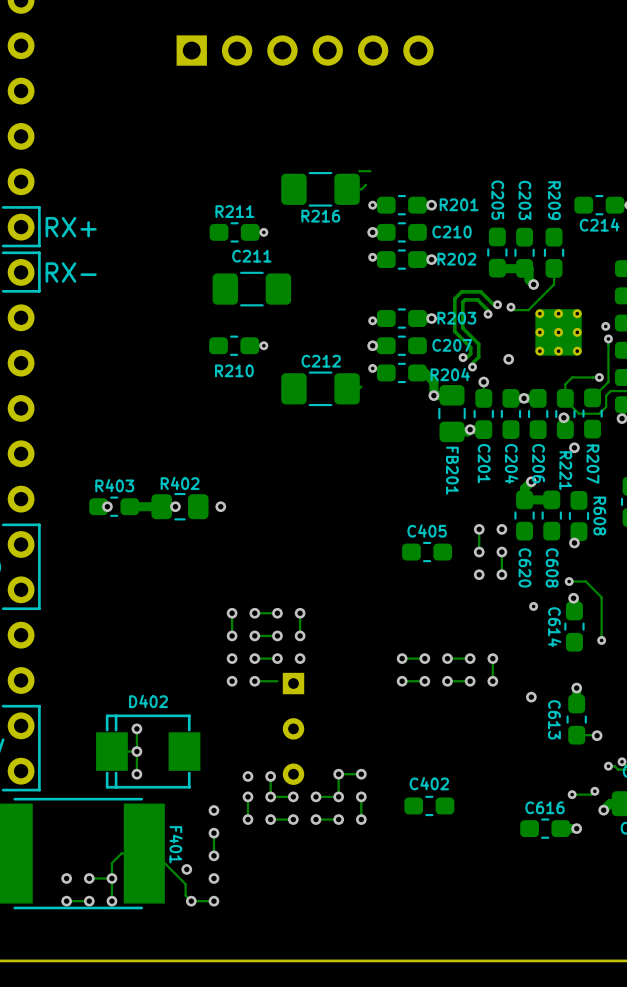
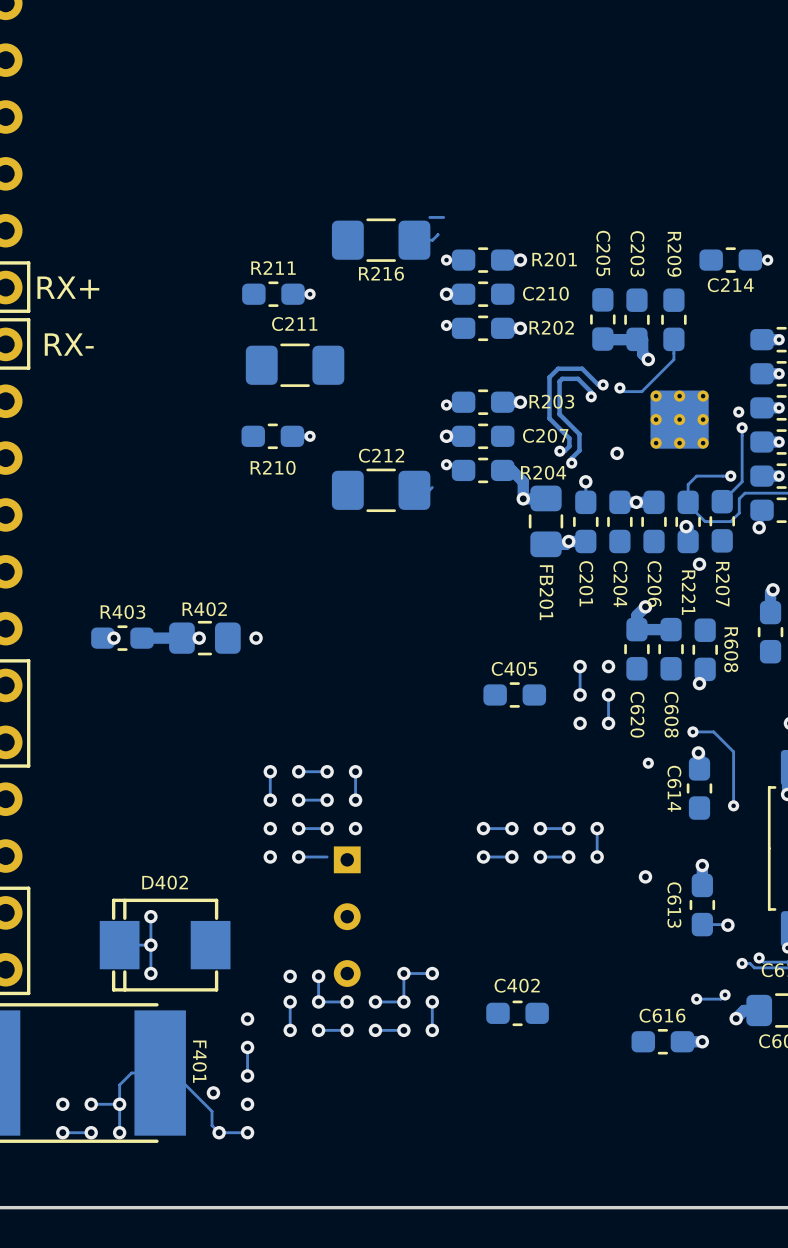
part: (305, 50) -> none

